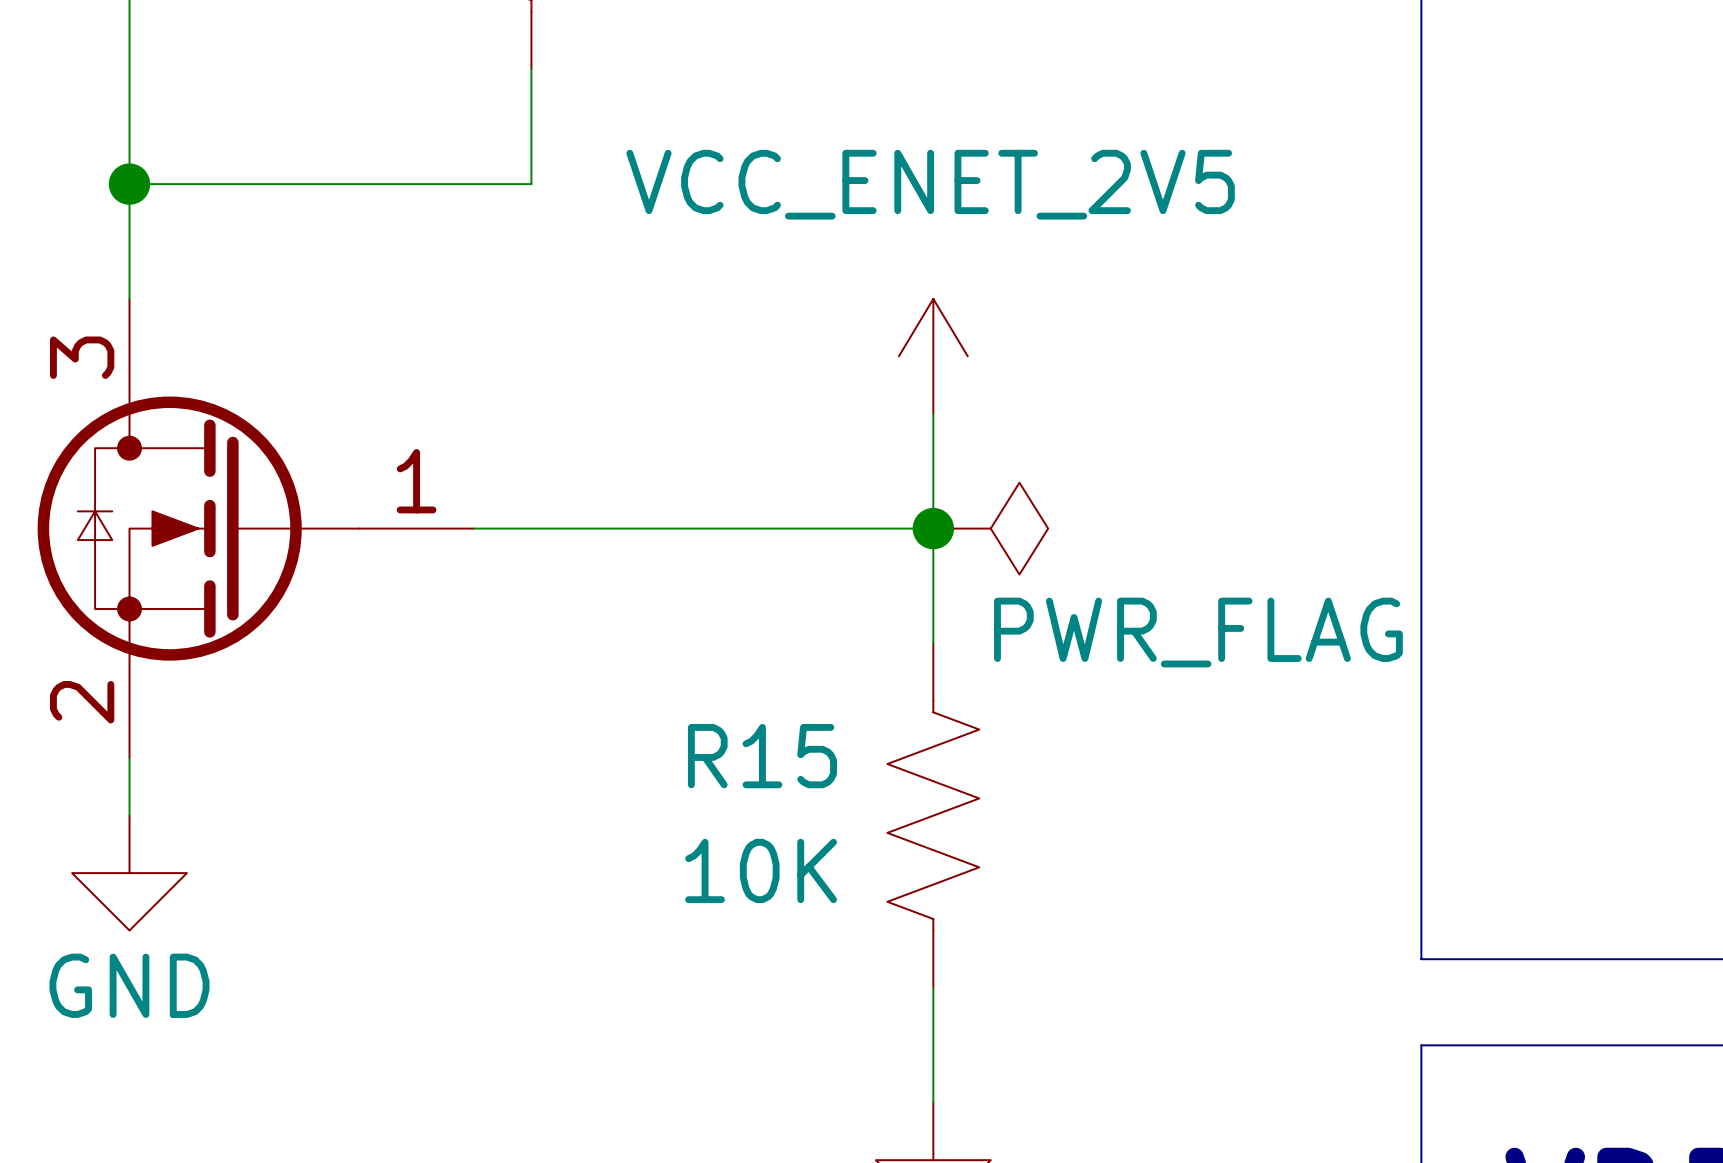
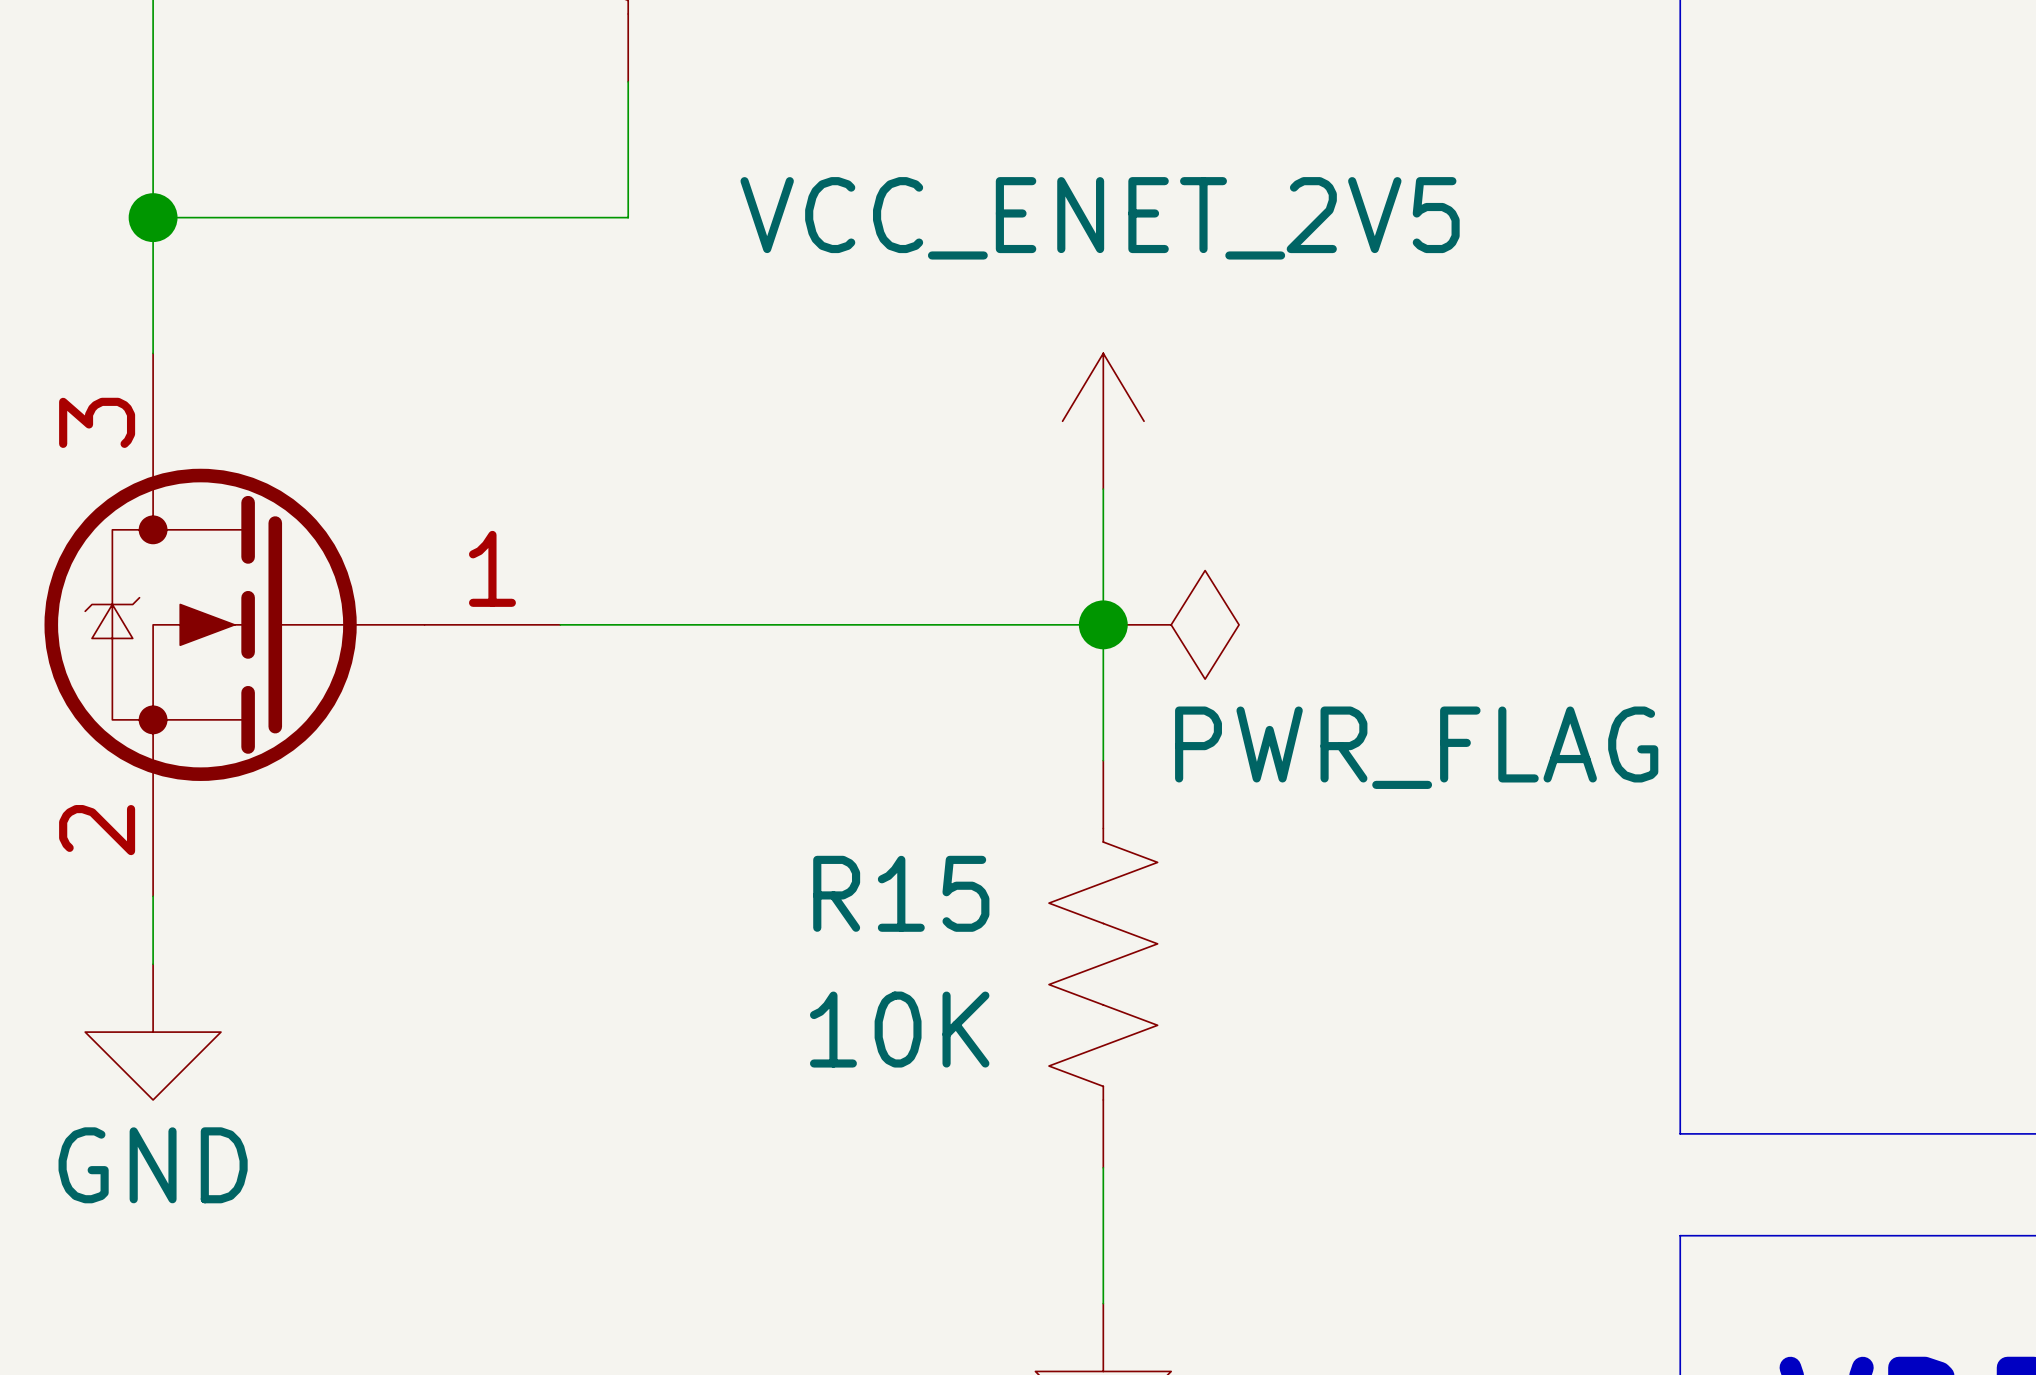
part symbol: [37, 298, 475, 759] -> [44, 353, 561, 897]

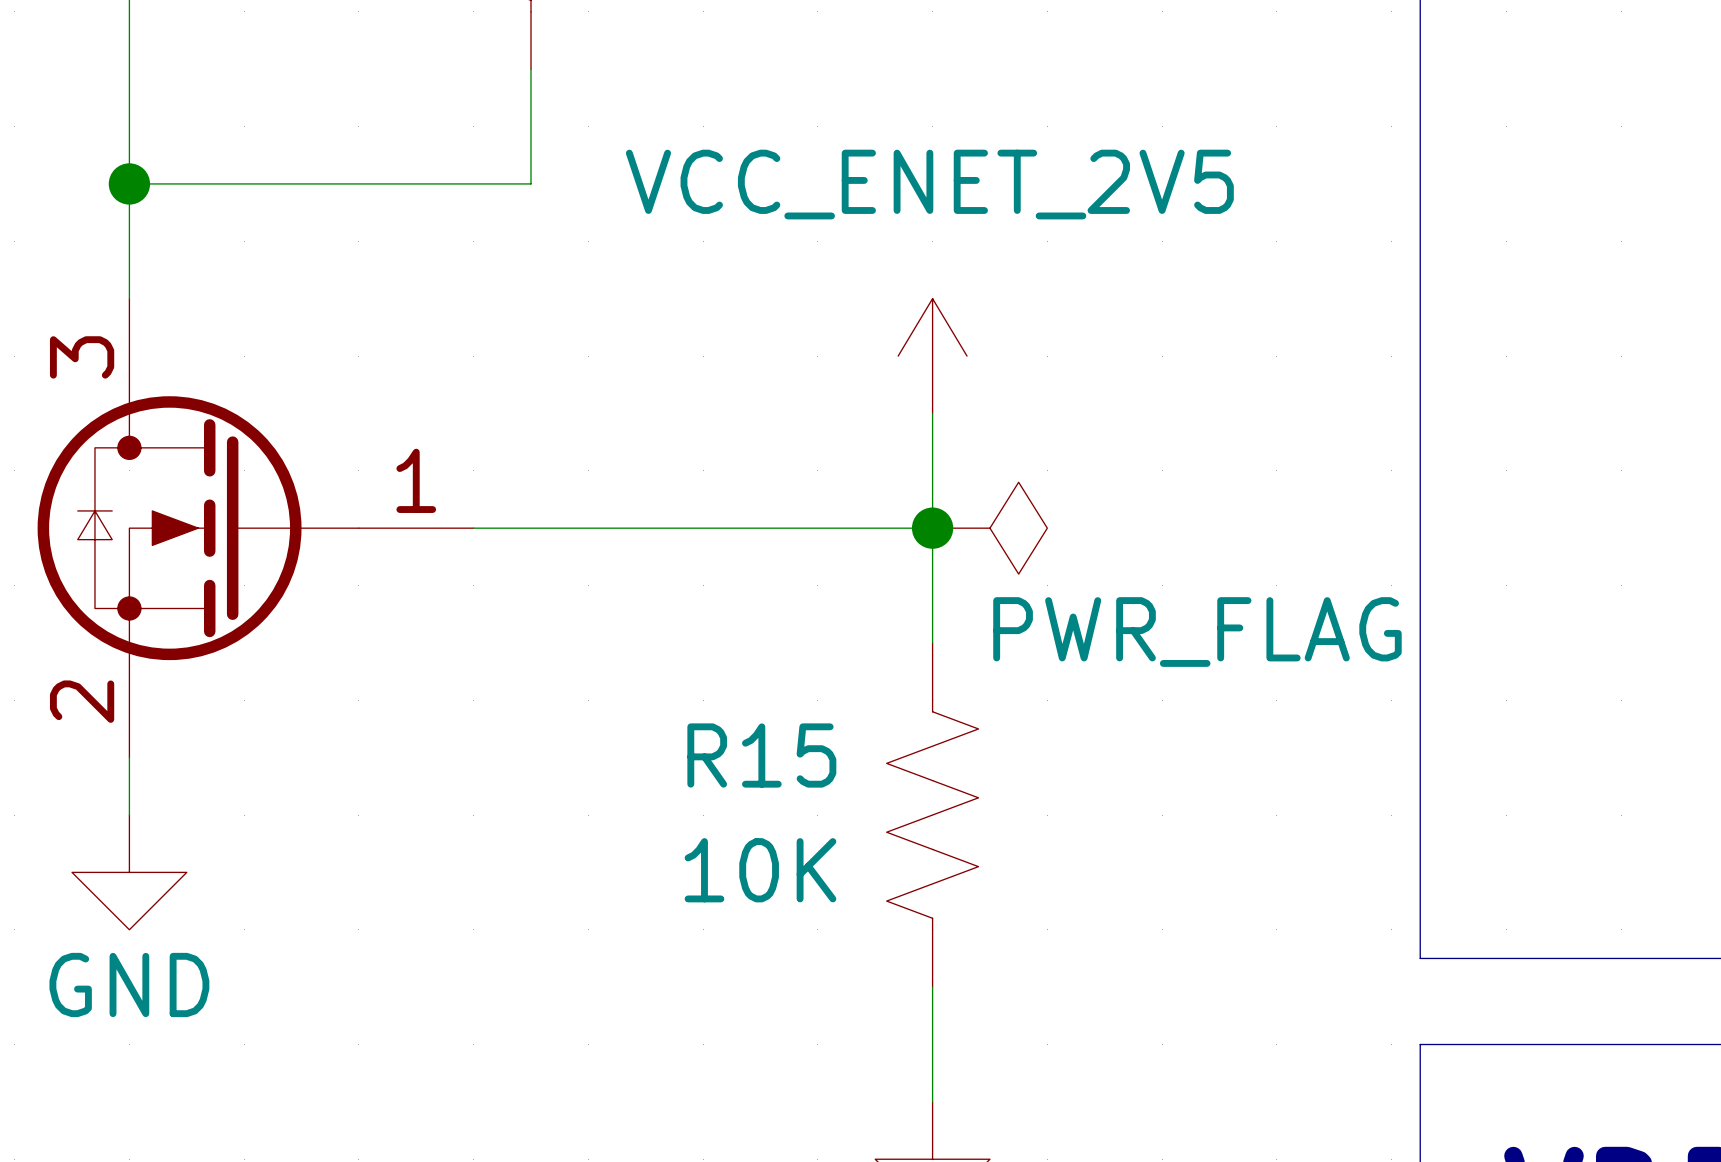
part symbol: [44, 353, 561, 897] -> [37, 298, 474, 758]

